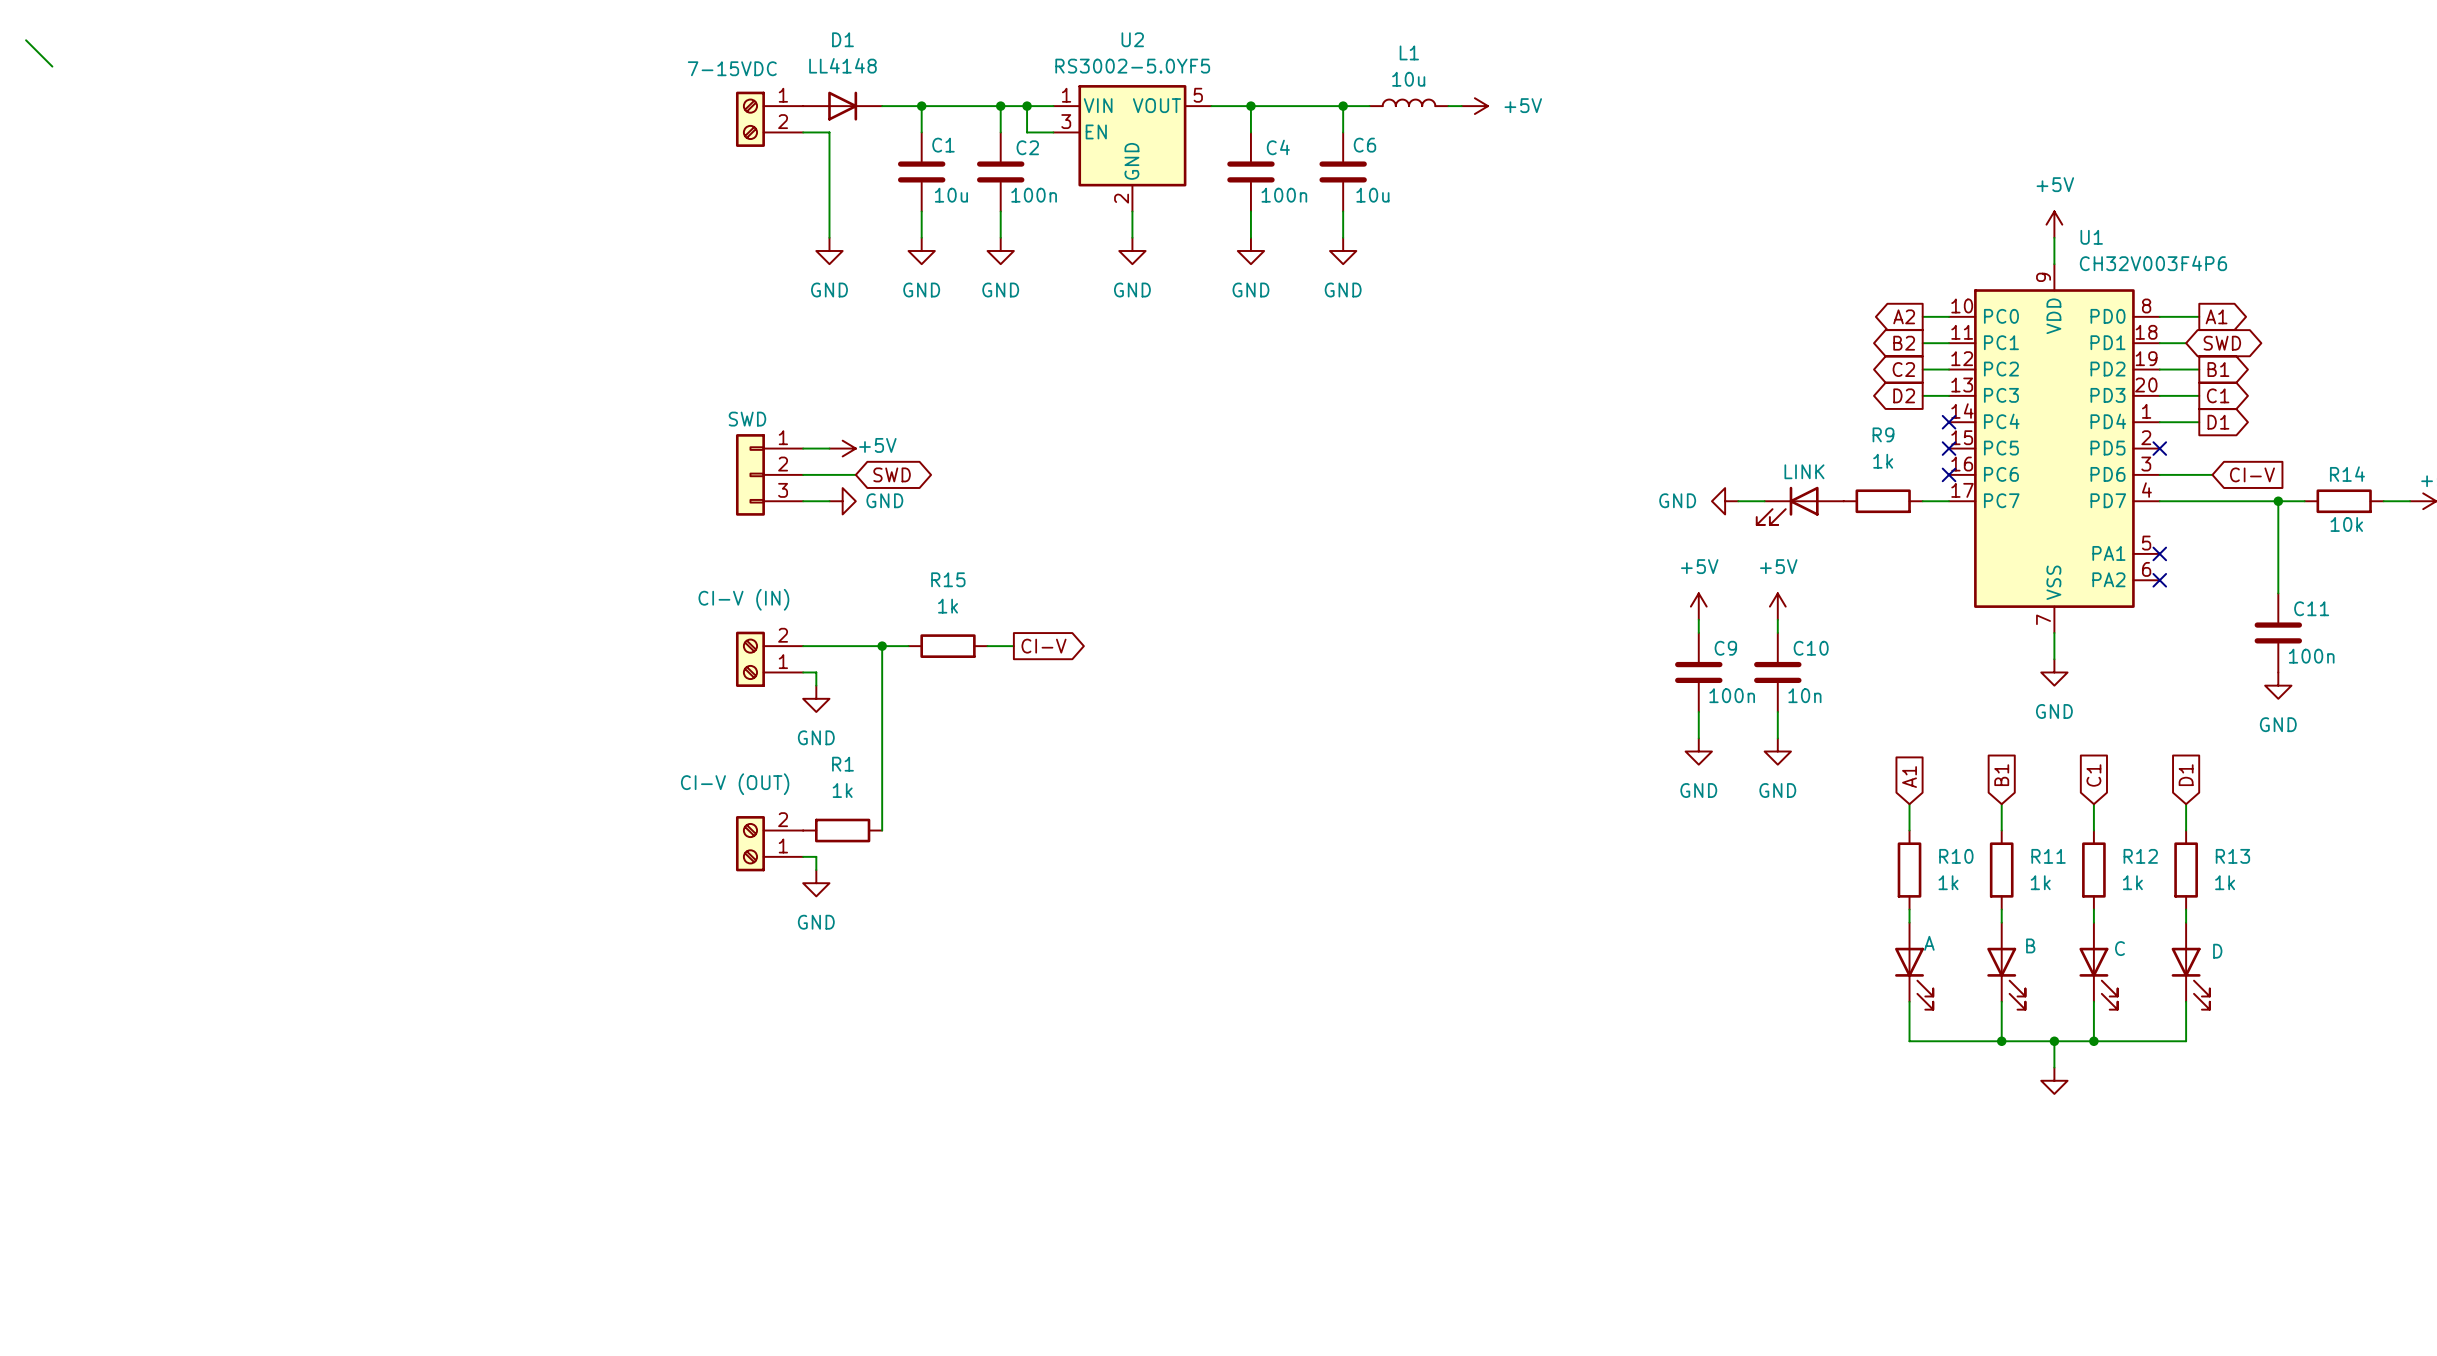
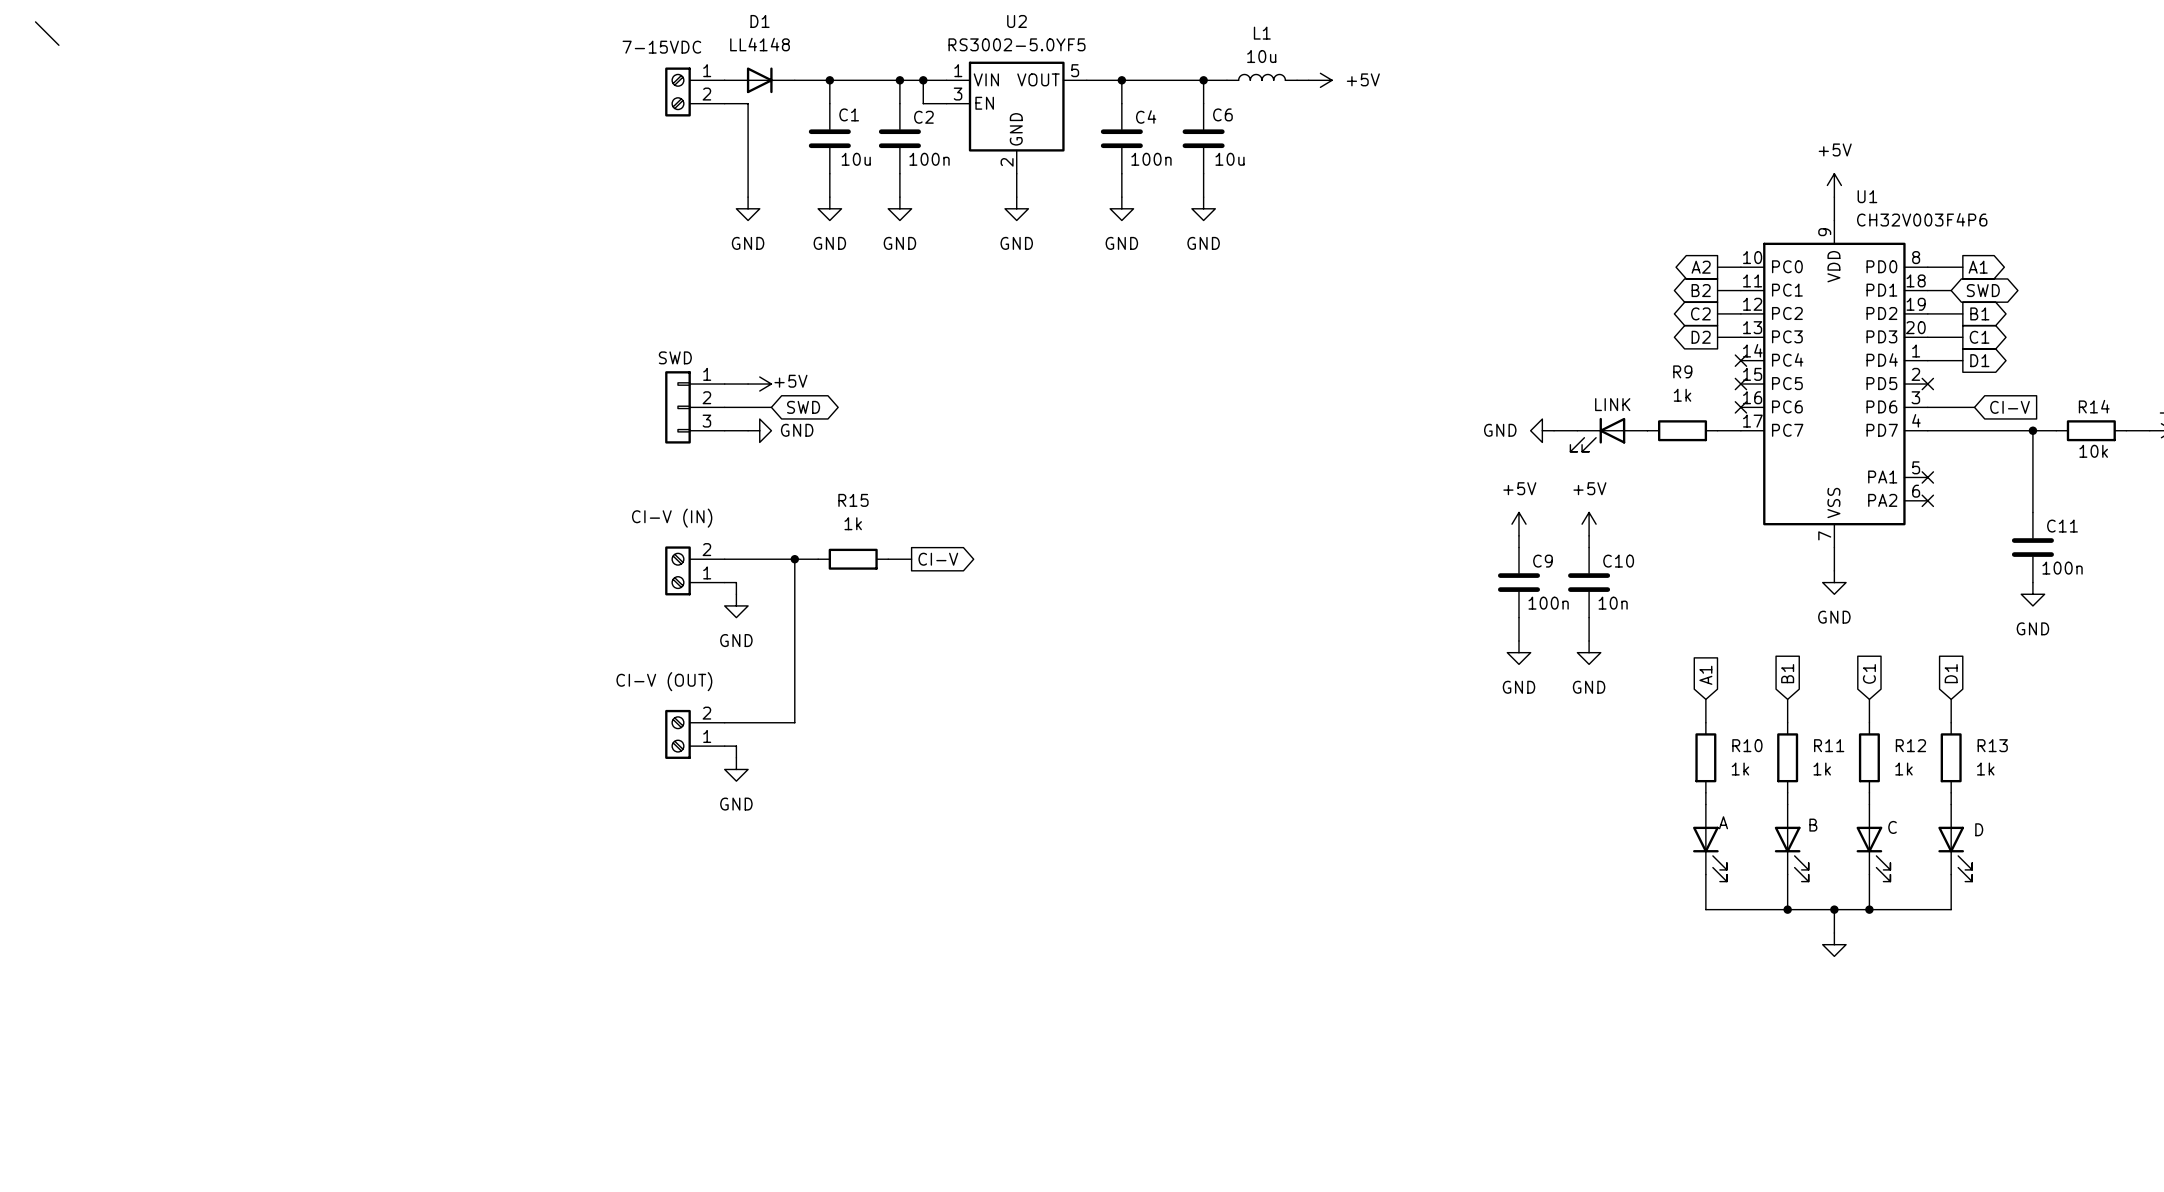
wire: none -> (724, 722) (794, 722)
R1: 1k (842, 830) -> none

